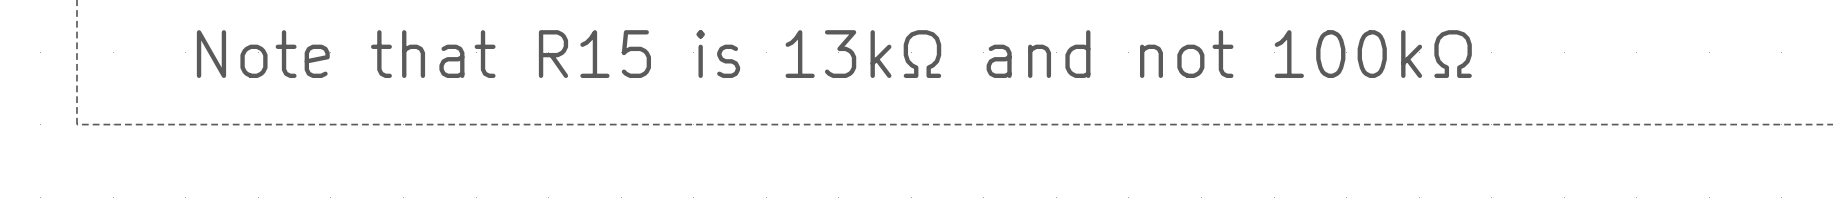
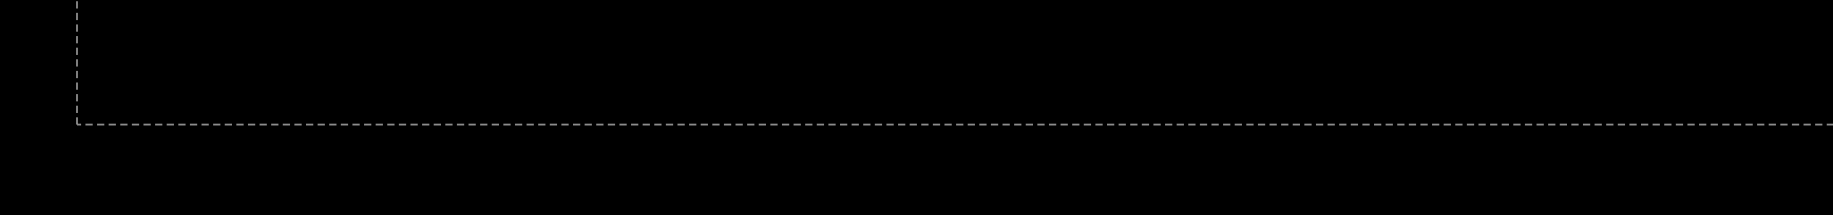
text: Note that R15 is 13kΩ and not 100kΩ (834, 54) -> none

